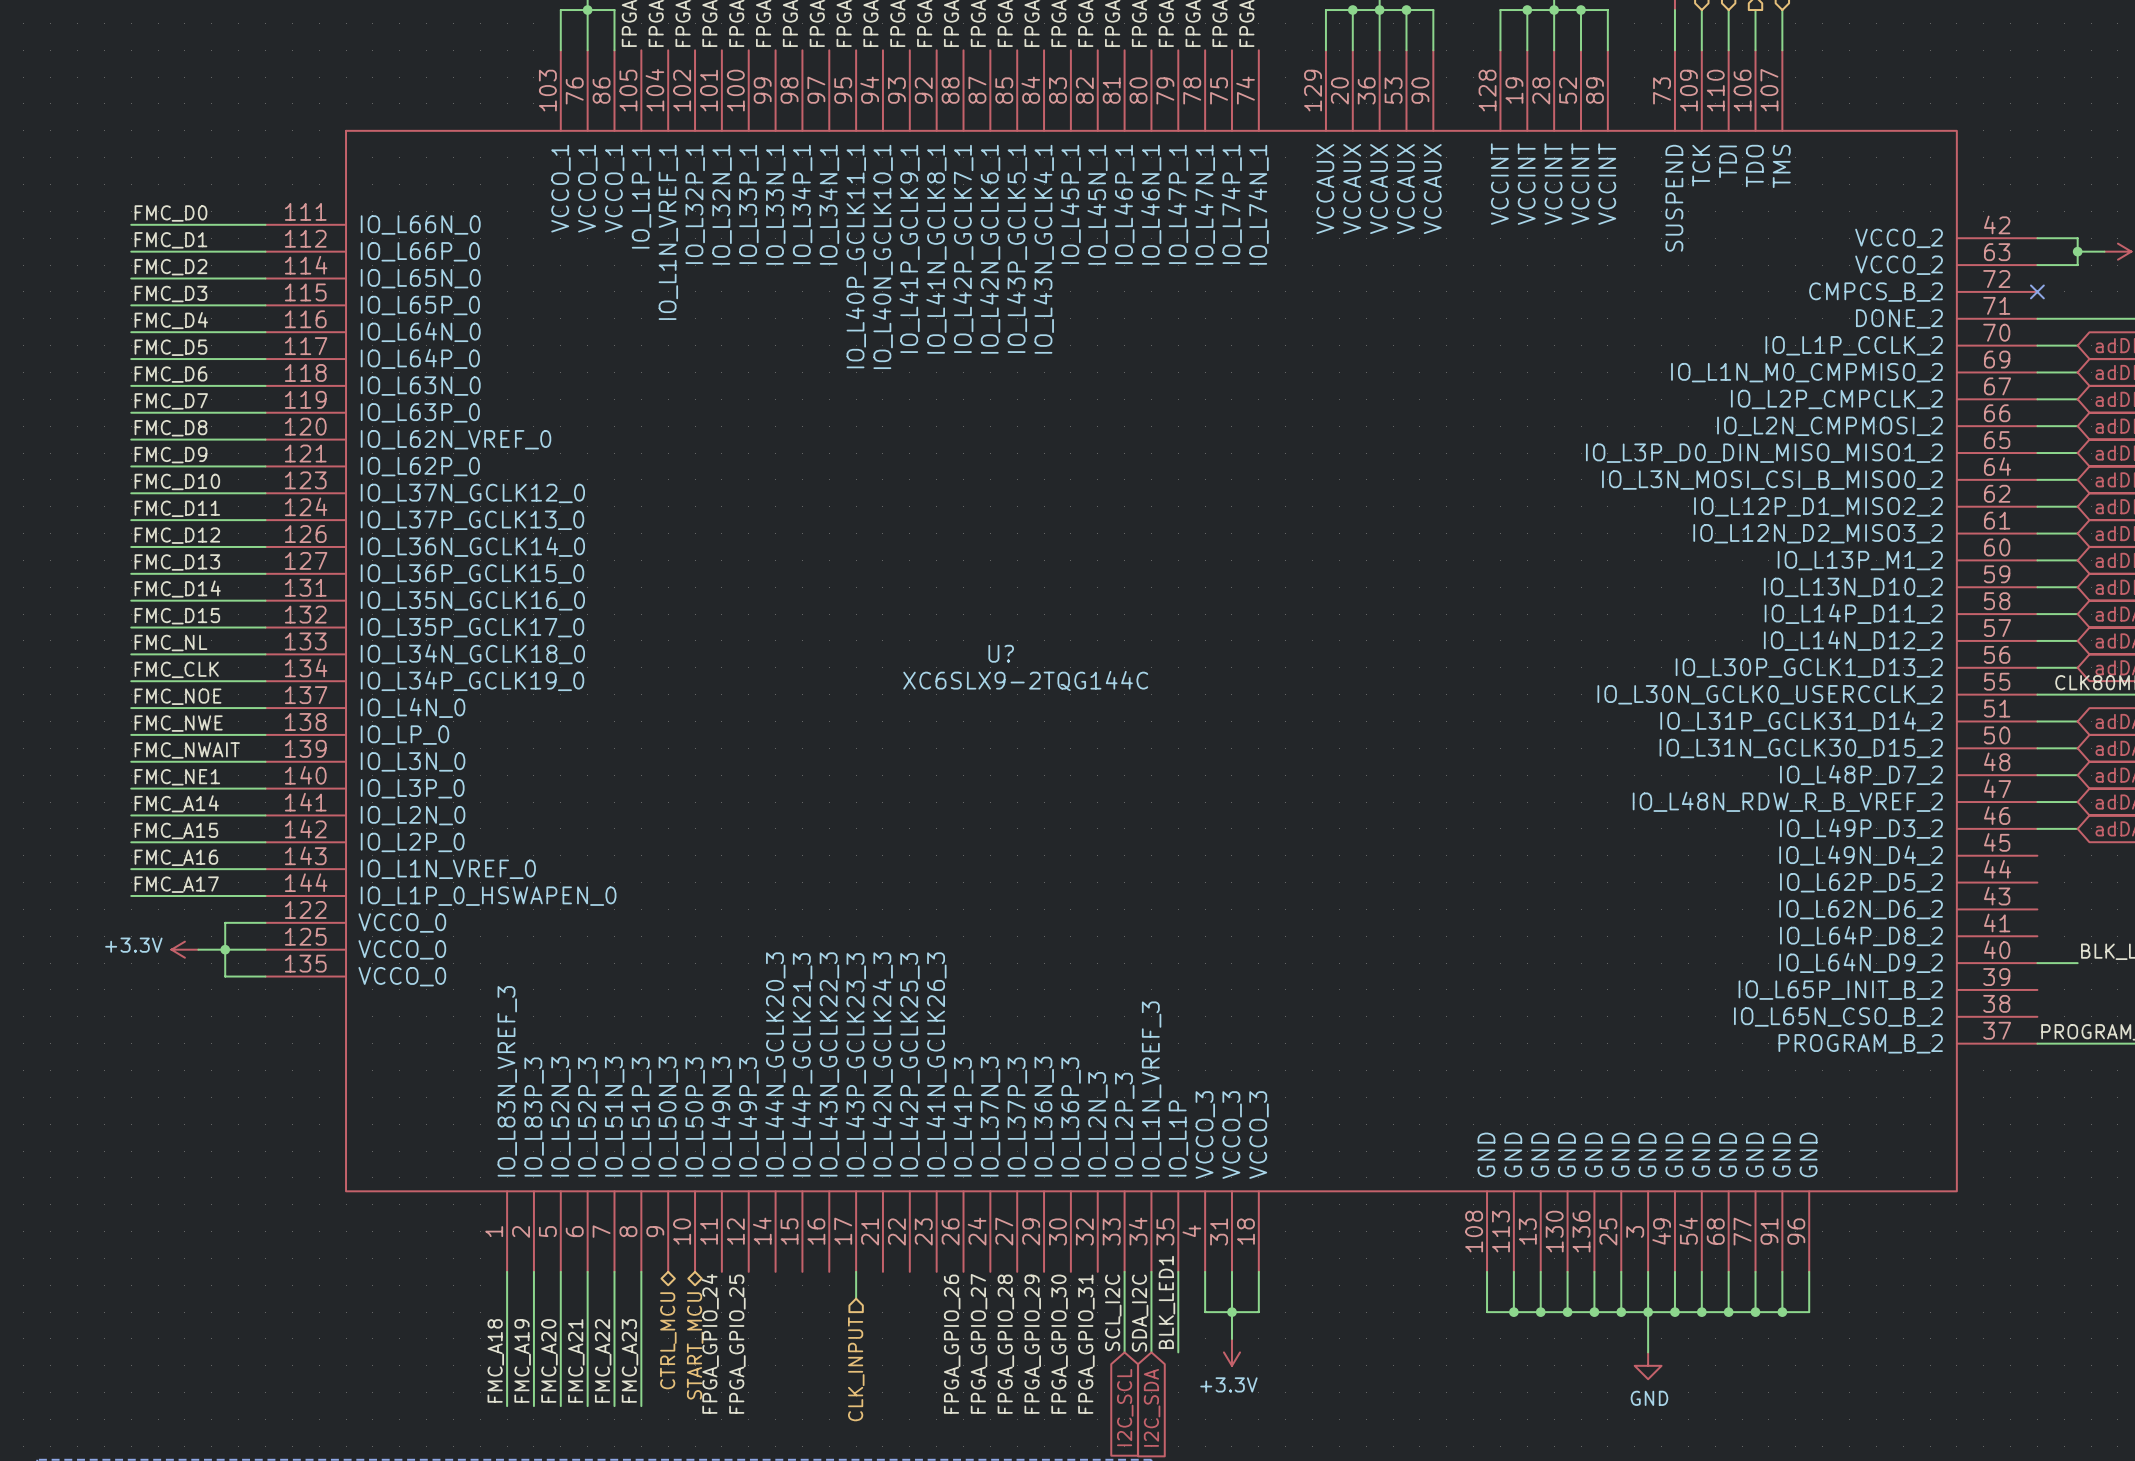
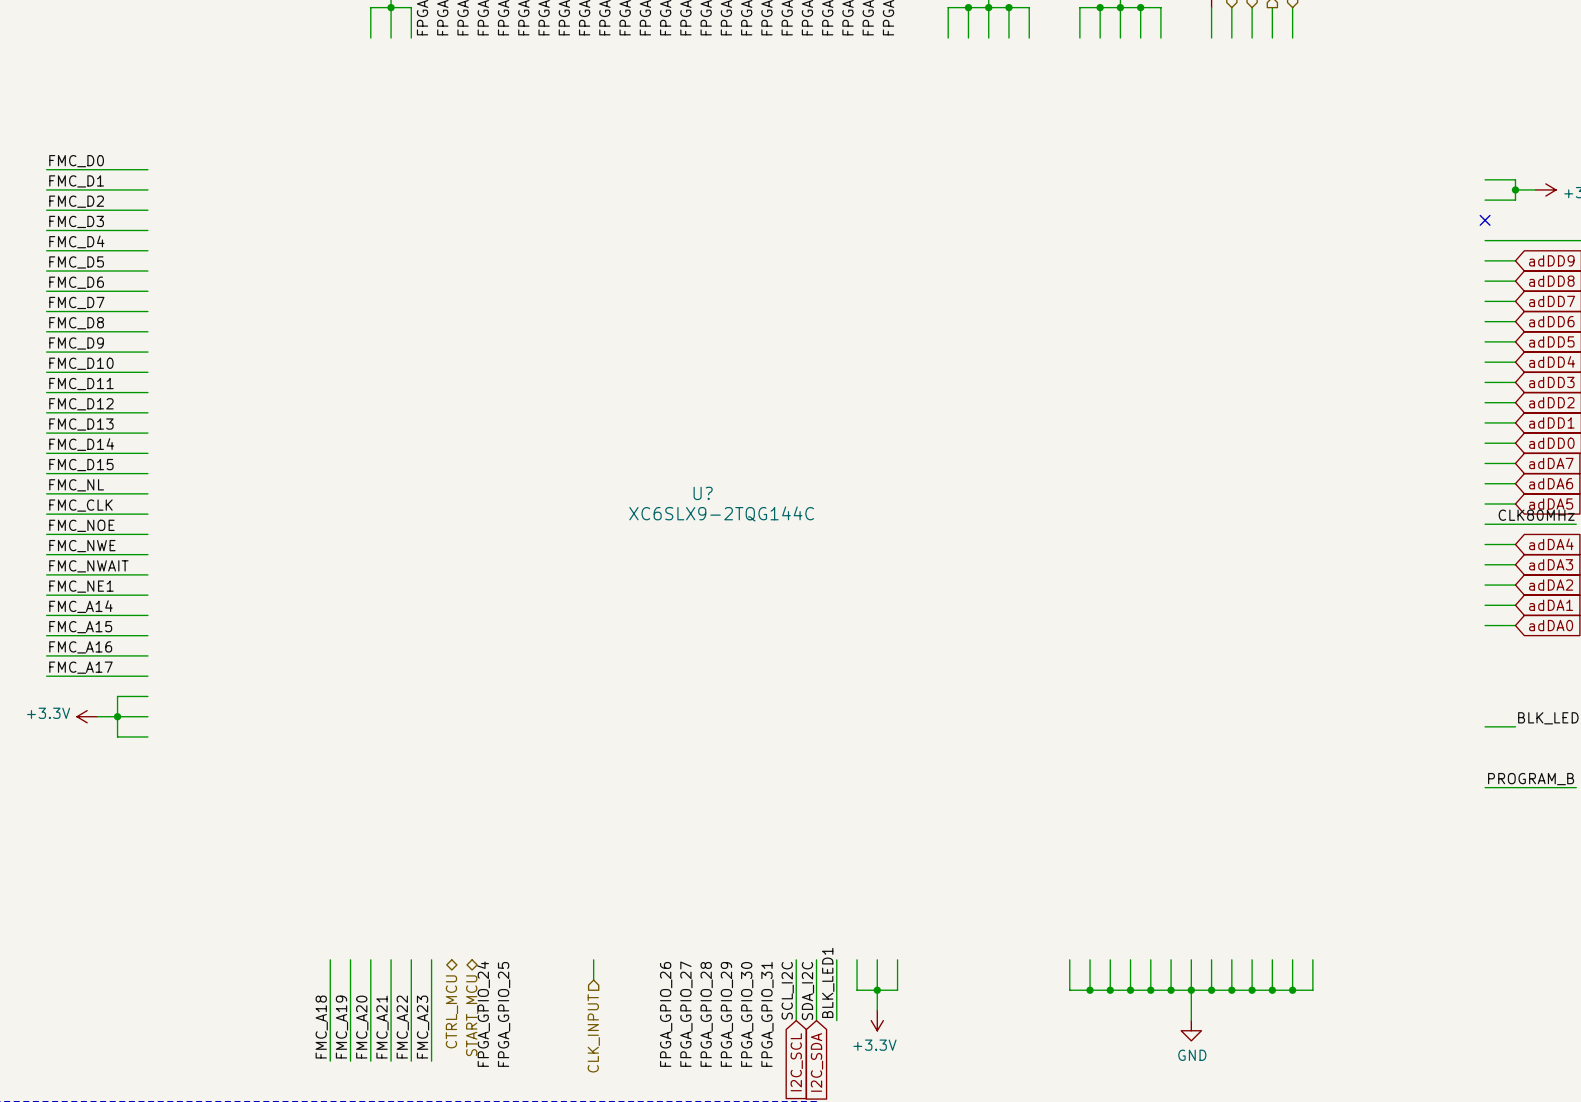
U?: XC6SLX9-2TQG144C (1151, 661) -> none

